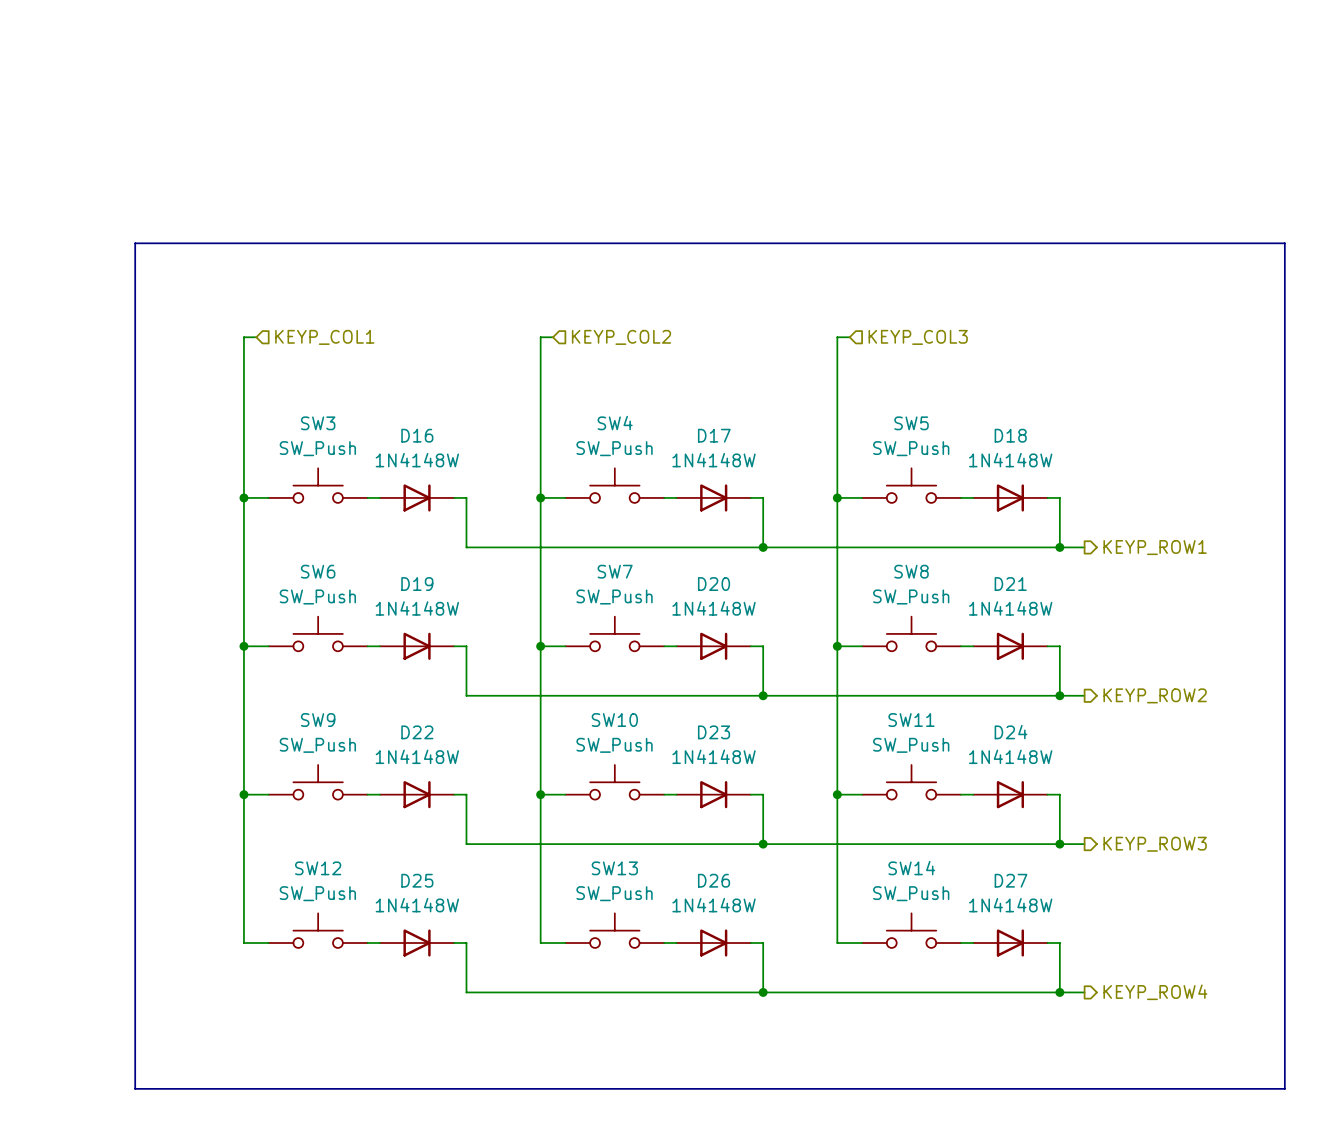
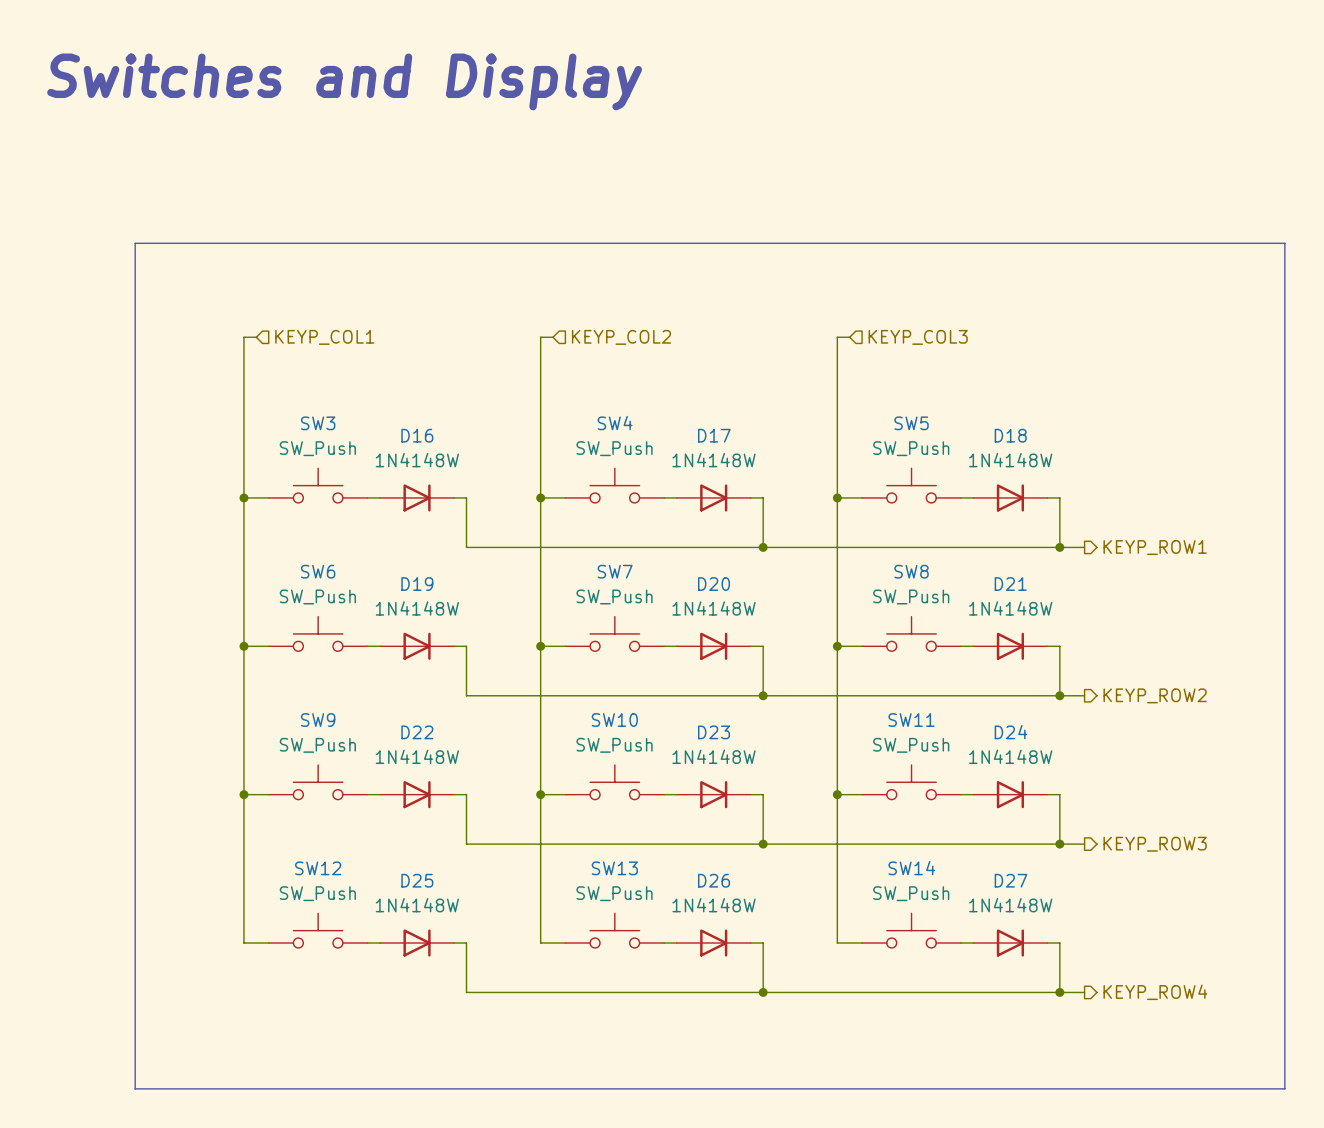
text: none -> Switches and Display (344, 81)

